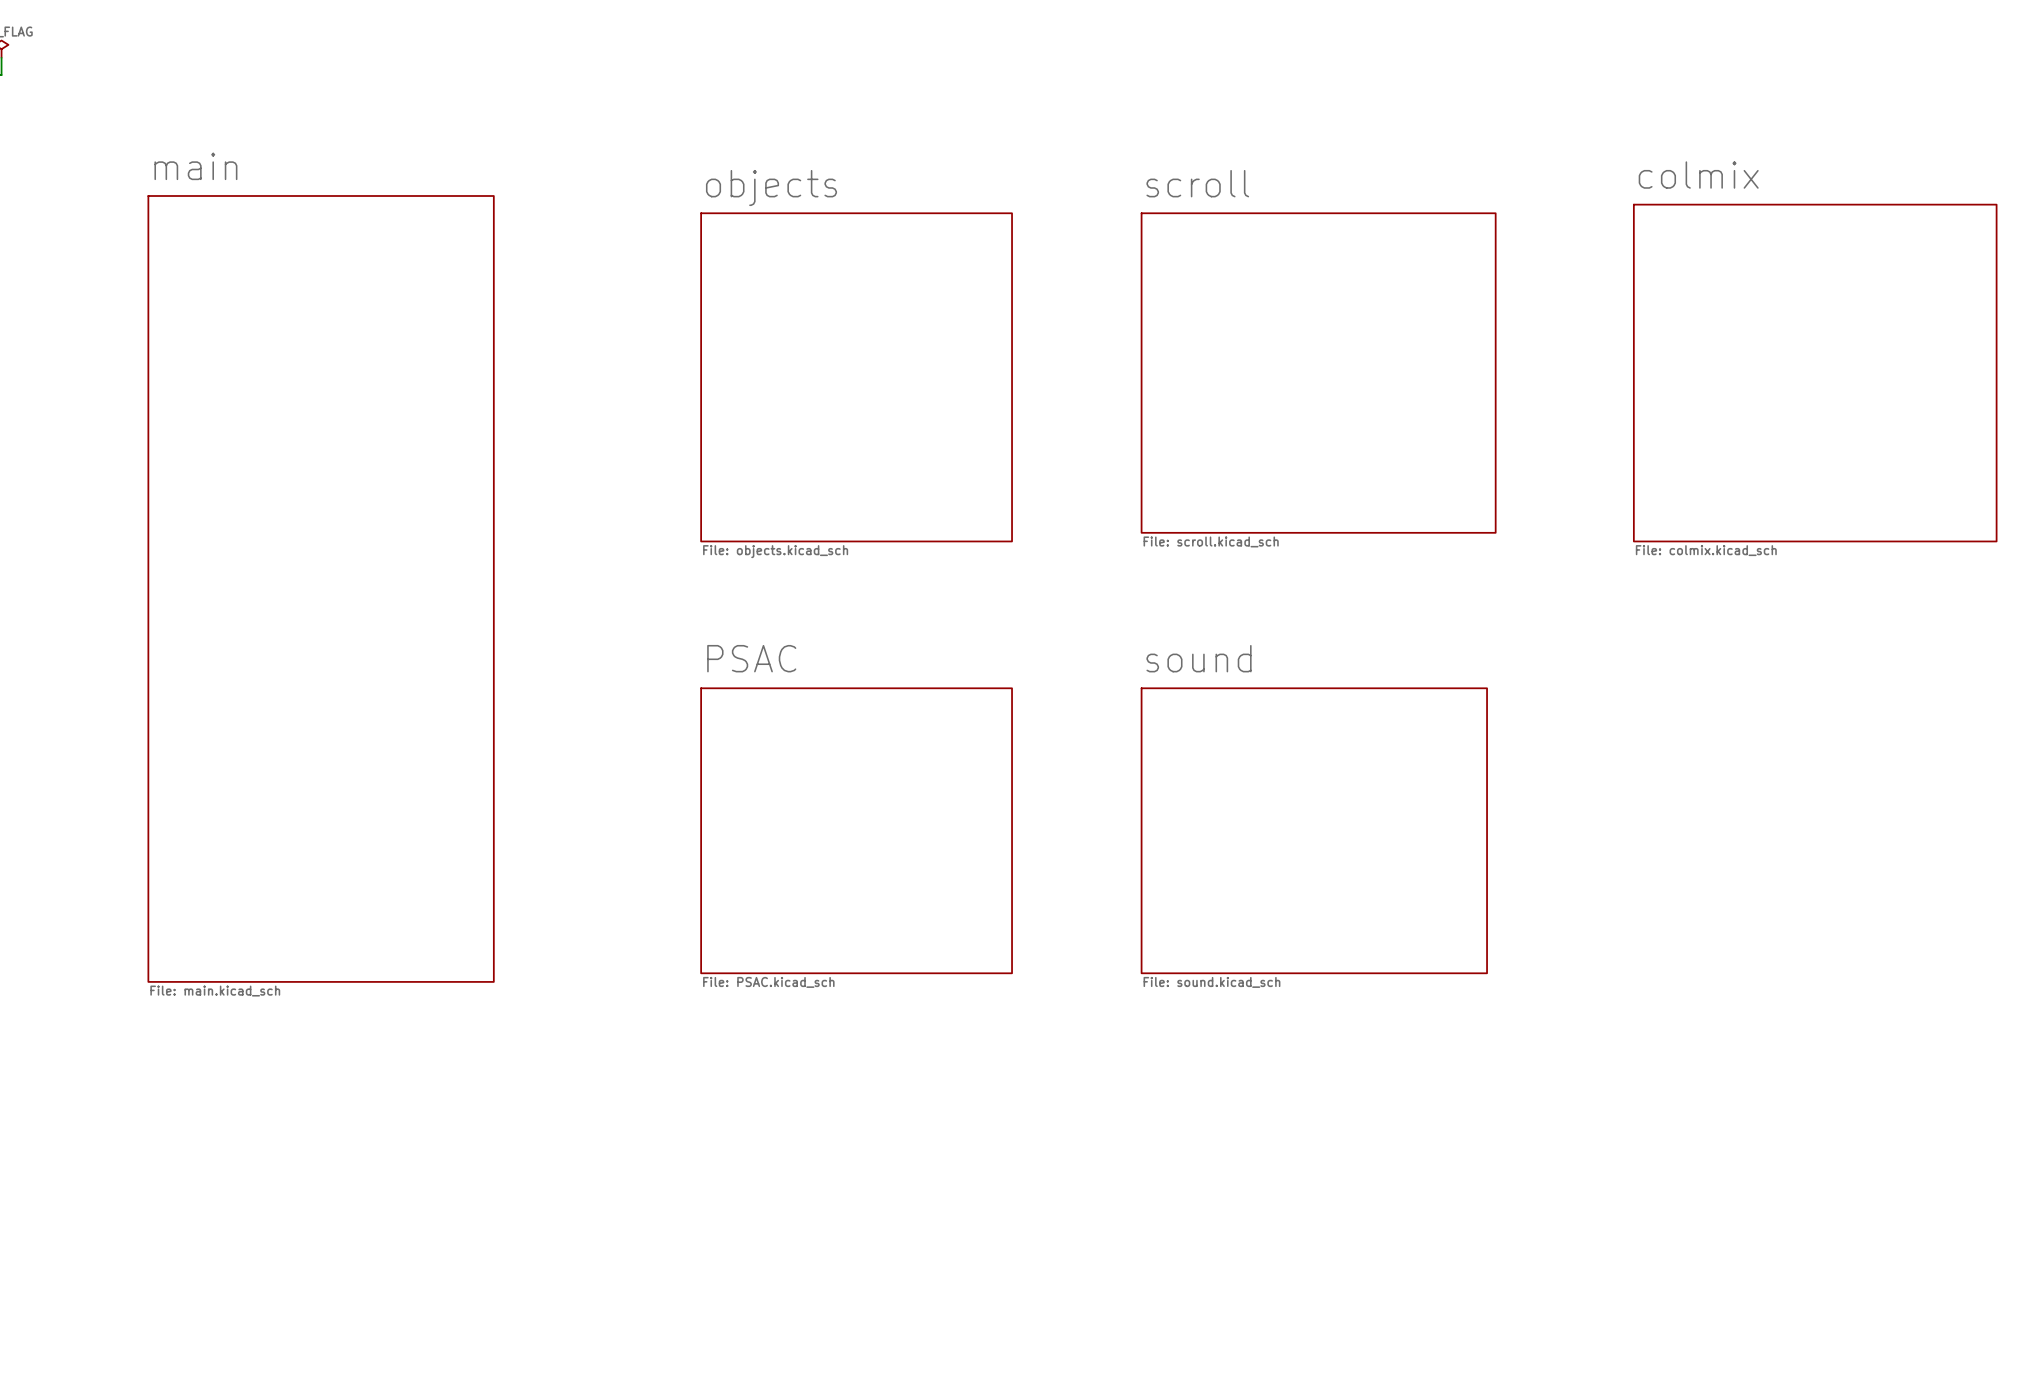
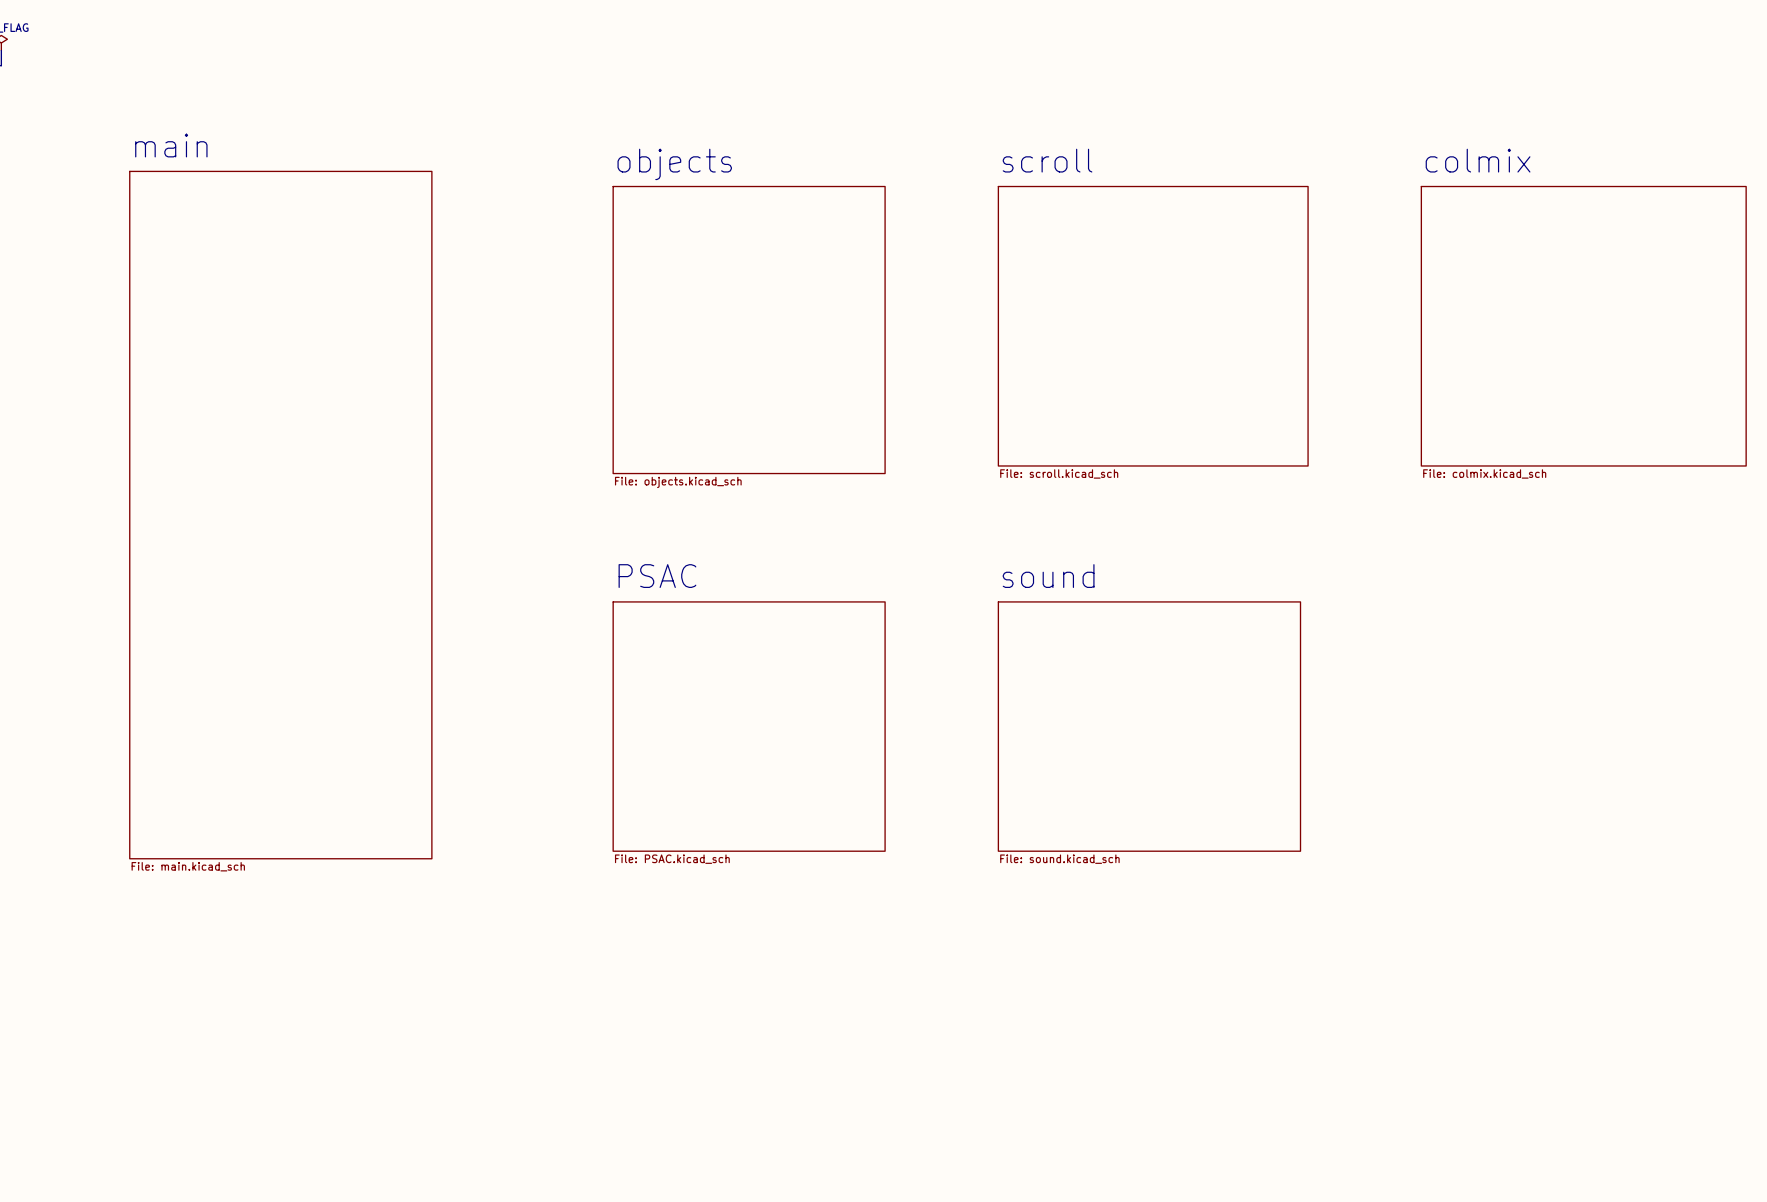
sheet colmix shape: [1633, 204, 1998, 542] -> [1420, 186, 1747, 467]

